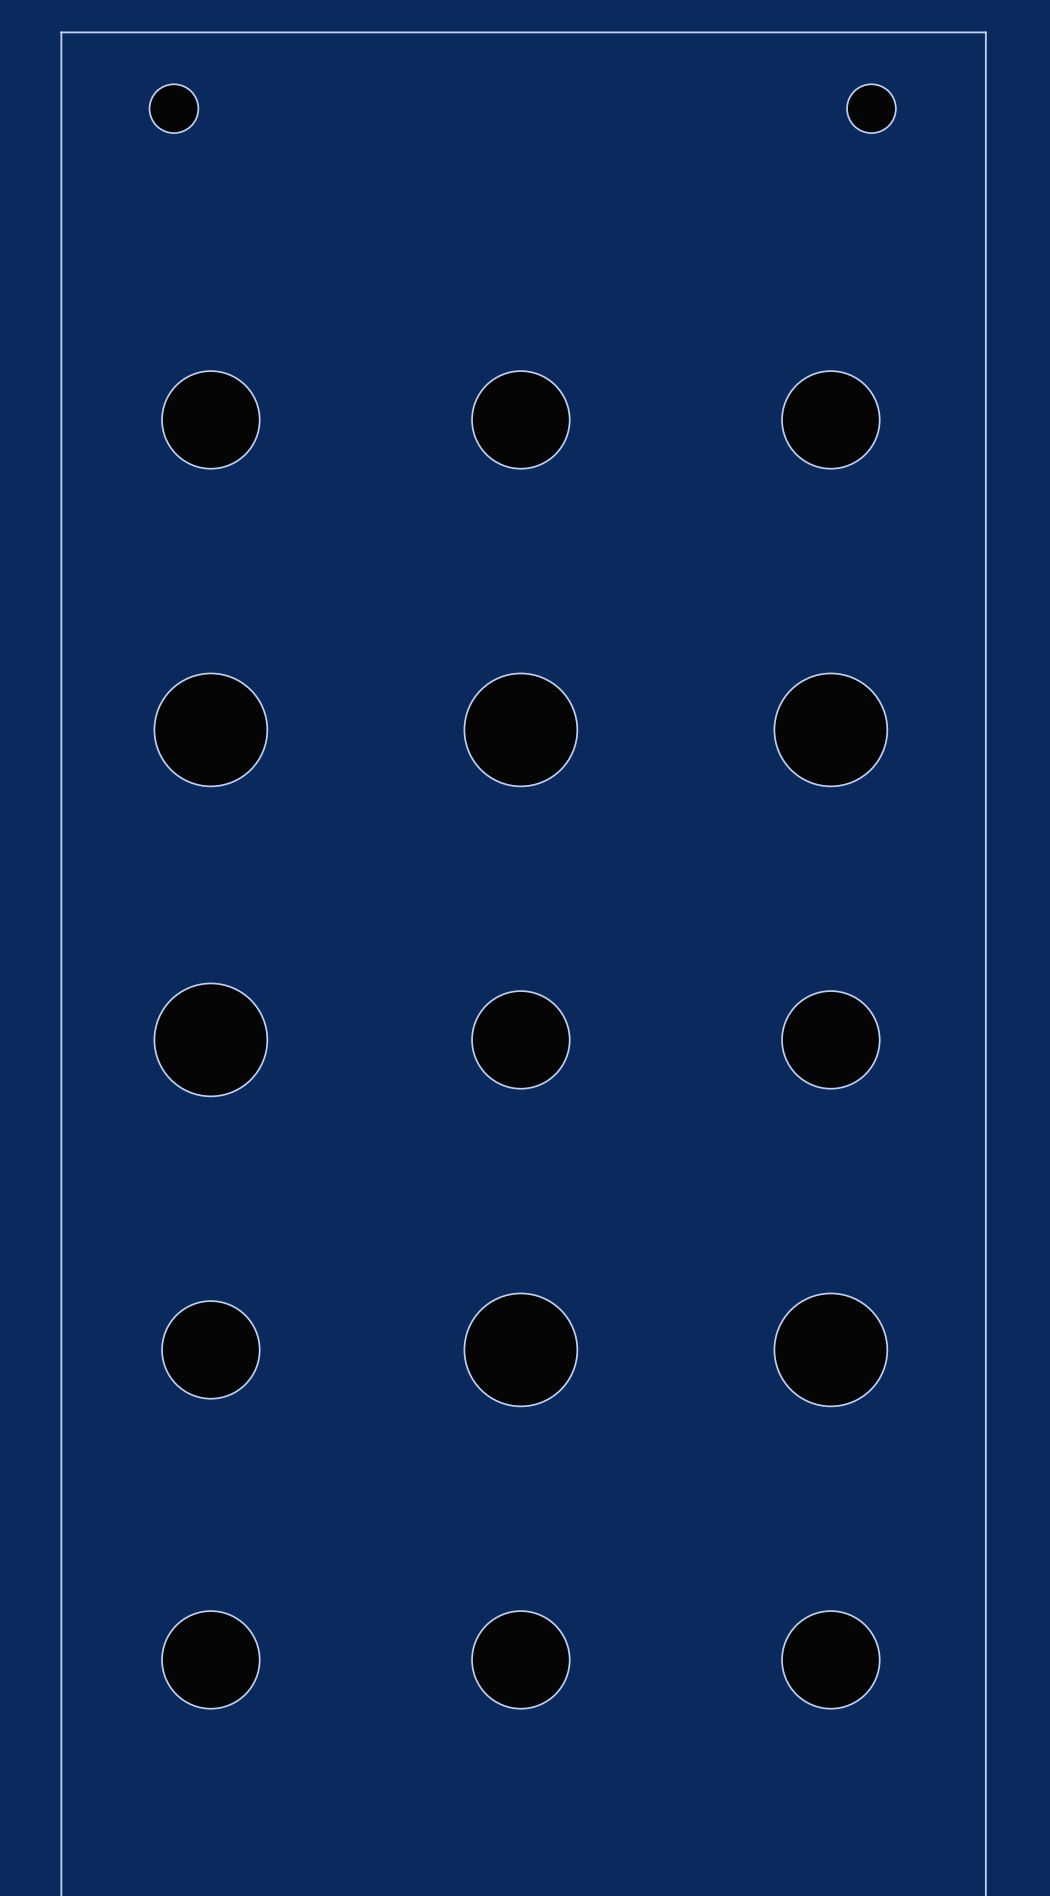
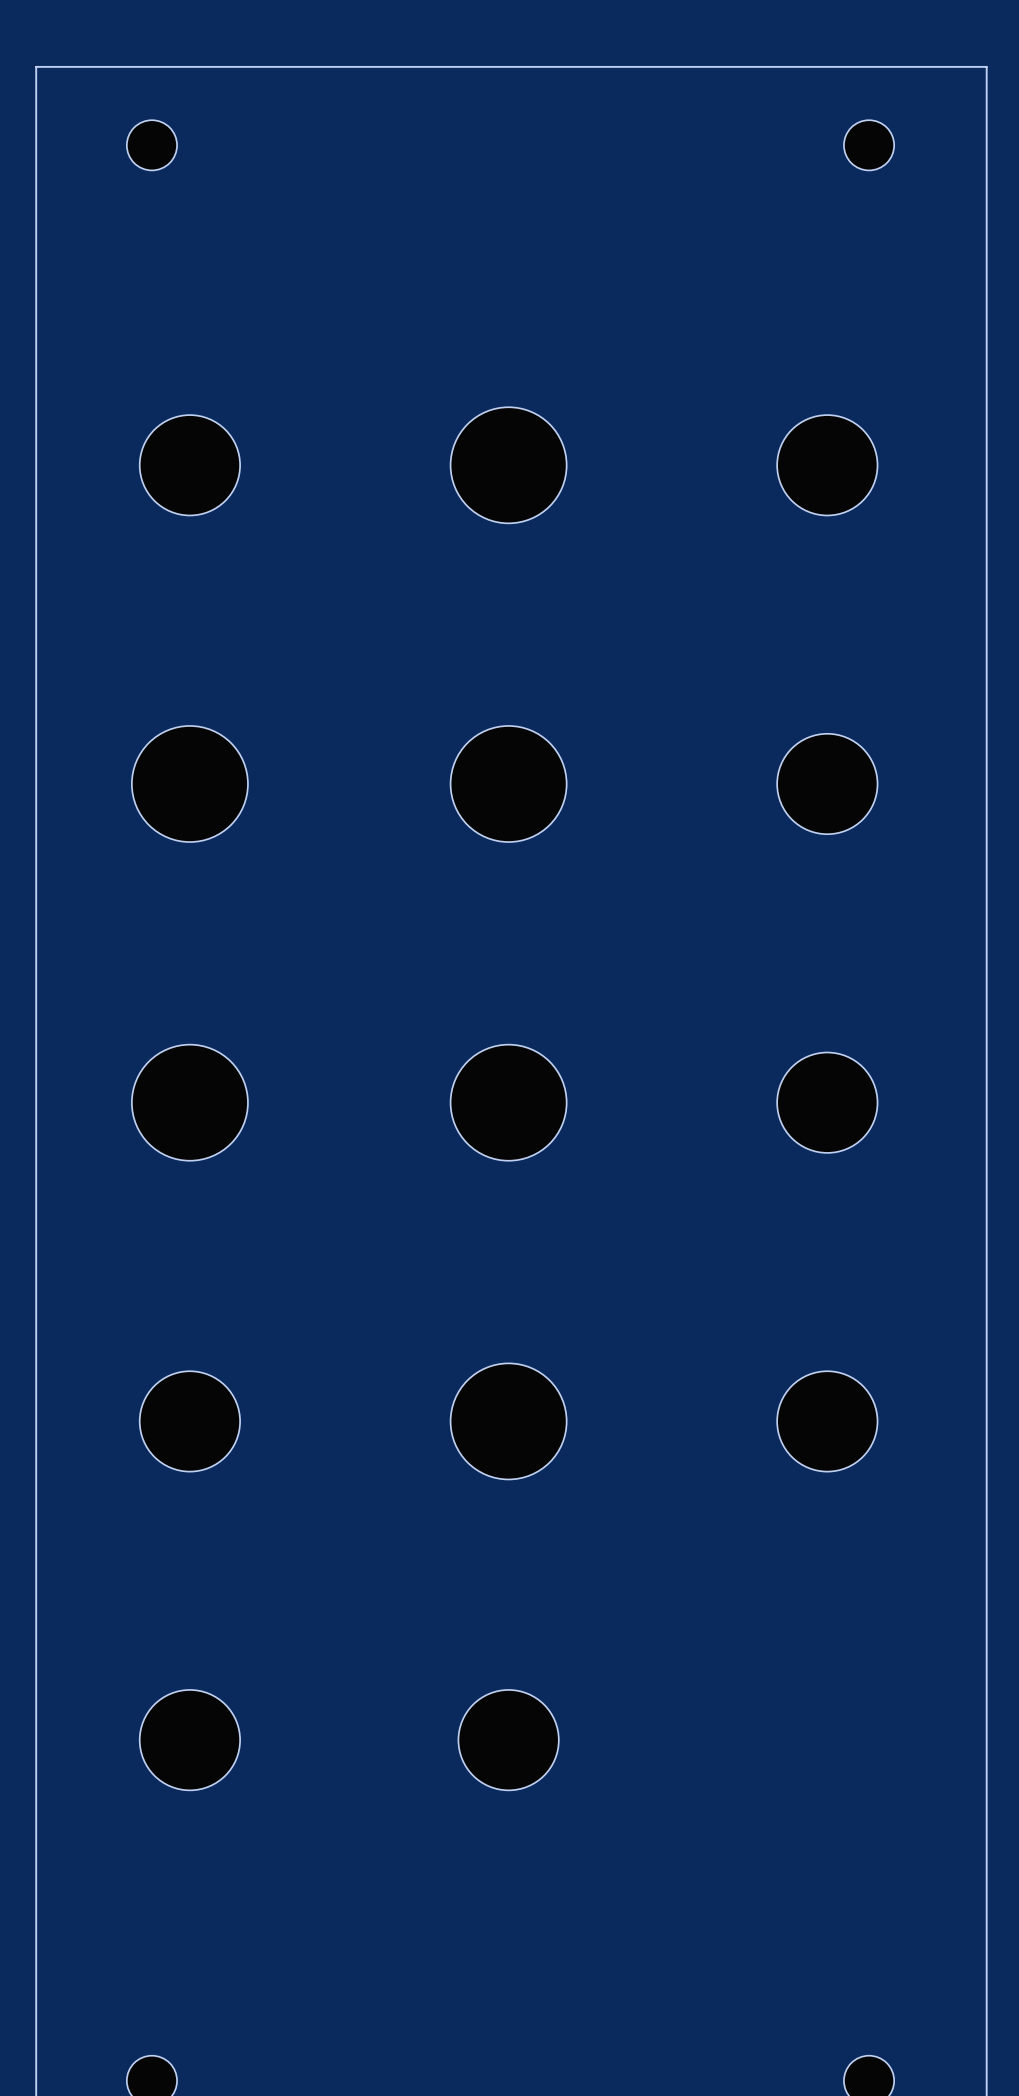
part footprint: [472, 371, 570, 469] -> [450, 407, 567, 524]
part footprint: [774, 673, 888, 787] -> [777, 733, 878, 835]
part footprint: [472, 991, 570, 1089] -> [450, 1044, 567, 1161]
part footprint: [774, 1293, 888, 1407] -> [777, 1371, 878, 1472]
part: (830, 1659) -> none

